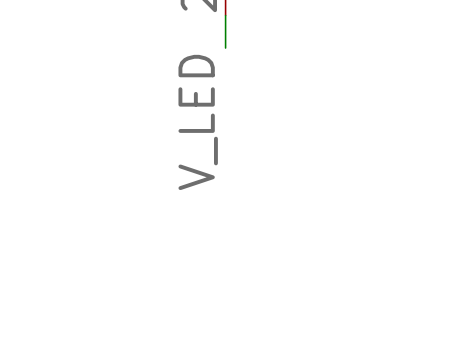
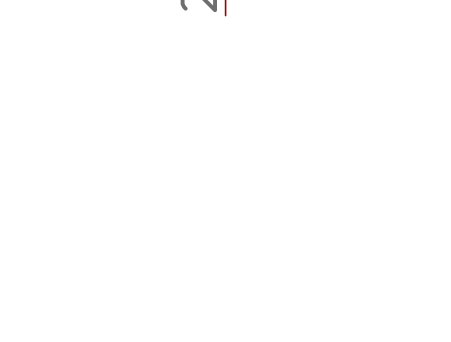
wire: (225, 15) (225, 48) -> none
label: V_LED (198, 122) -> none

